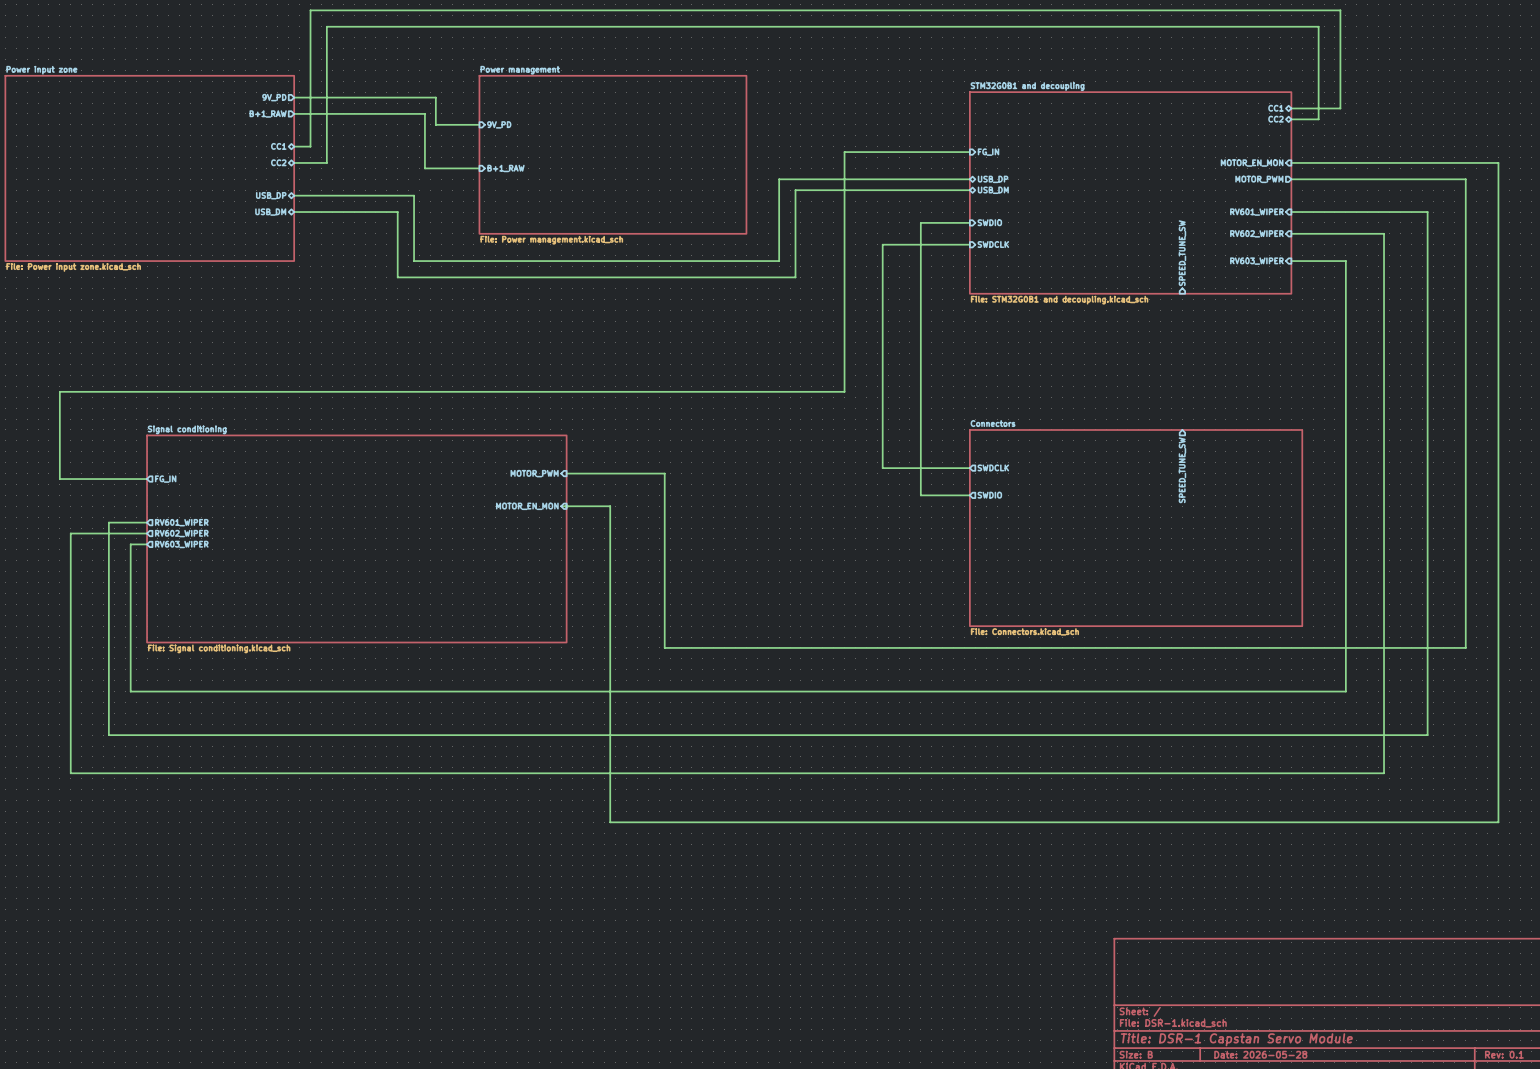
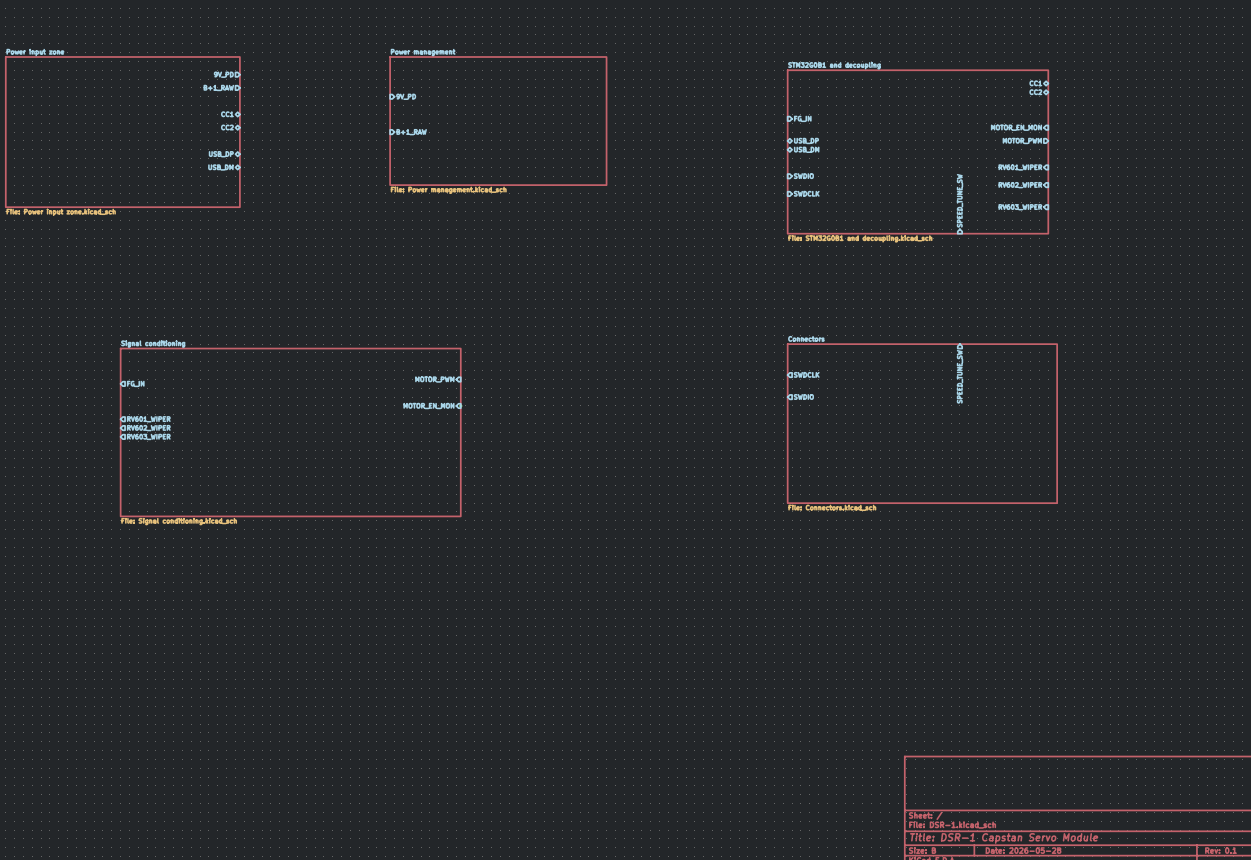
wire: (294, 97) (435, 97) (435, 124) (479, 124) -> none
wire: (1291, 108) (1340, 108) (1340, 10) (310, 10) (310, 146) (294, 146) -> none
wire: (294, 113) (424, 113) (424, 168) (479, 168) -> none
wire: (1291, 119) (1318, 119) (1318, 26) (326, 26) (326, 162) (294, 162) -> none
wire: (969, 152) (844, 152) (844, 391) (59, 391) (59, 479) (147, 479) -> none
wire: (1291, 162) (1498, 162) (1498, 822) (610, 822) (610, 506) (561, 506) -> none
wire: (969, 179) (779, 179) (779, 261) (414, 261) (414, 195) (294, 195) -> none
wire: (1291, 179) (1465, 179) (1465, 647) (664, 647) (664, 473) (566, 473) -> none
wire: (969, 190) (795, 190) (795, 277) (397, 277) (397, 212) (294, 212) -> none
wire: (1291, 212) (1427, 212) (1427, 735) (108, 735) (108, 522) (147, 522) -> none
wire: (969, 222) (920, 222) (920, 495) (969, 495) -> none
wire: (1291, 233) (1384, 233) (1384, 773) (70, 773) (70, 533) (147, 533) -> none
wire: (969, 244) (882, 244) (882, 468) (969, 468) -> none
wire: (1291, 261) (1345, 261) (1345, 691) (130, 691) (130, 544) (147, 544) -> none

